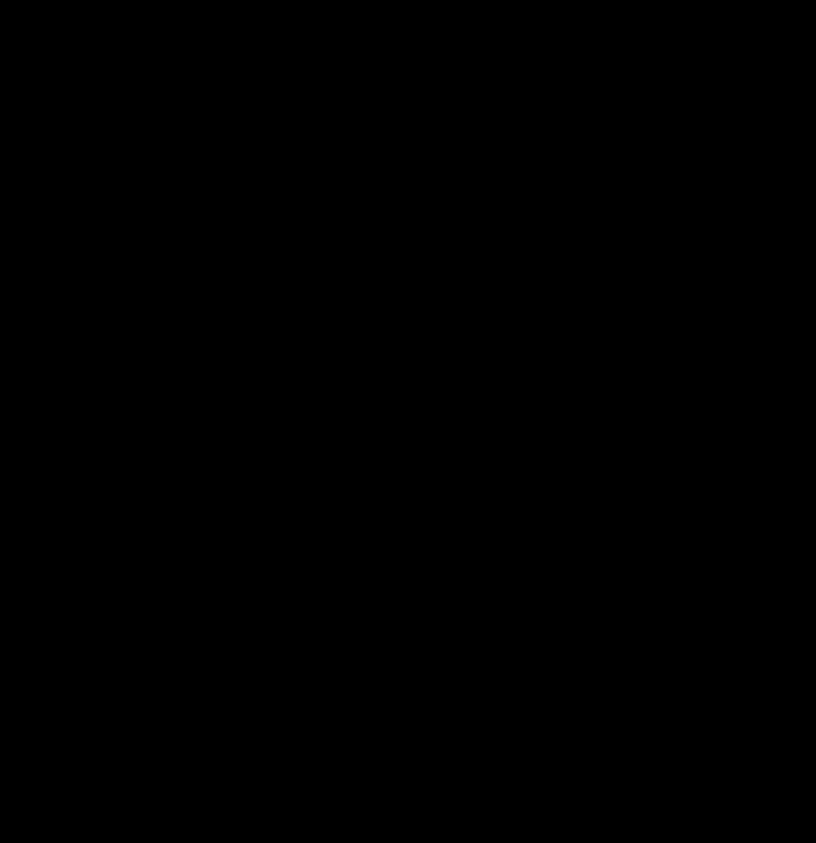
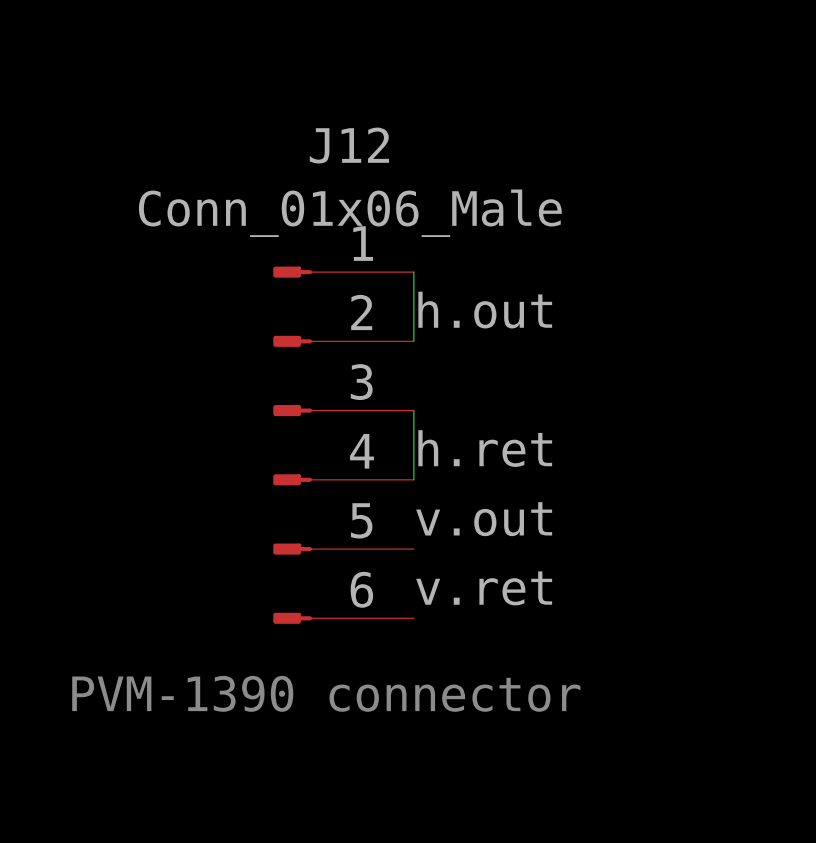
wire: none -> (413, 272) (413, 341)
label: none -> h.out (485, 310)
wire: none -> (413, 410) (413, 479)
J12: none -> Conn_01x06_Male (343, 445)
label: none -> h.ret (485, 448)
label: none -> v.out (484, 519)
label: none -> v.ret (484, 588)
text: none -> PVM-1390 connector (326, 693)

